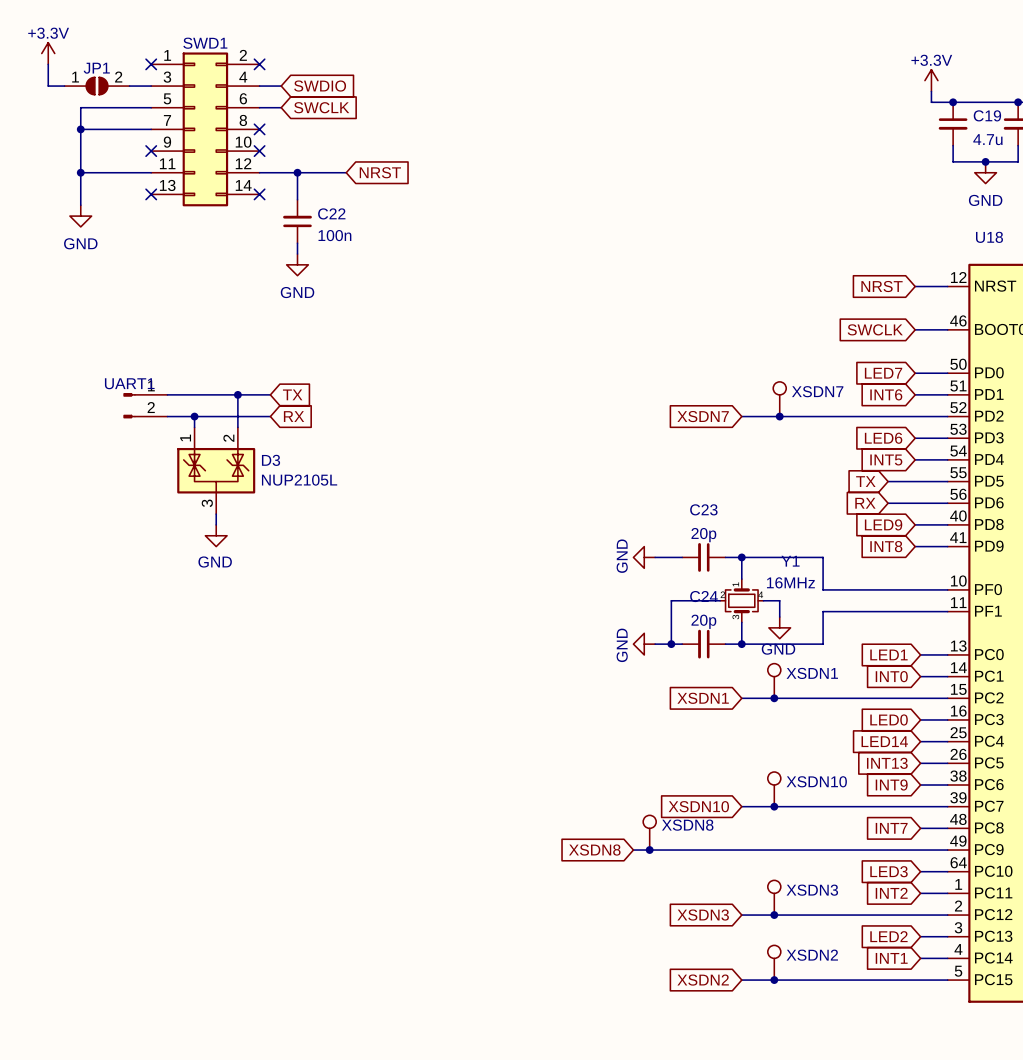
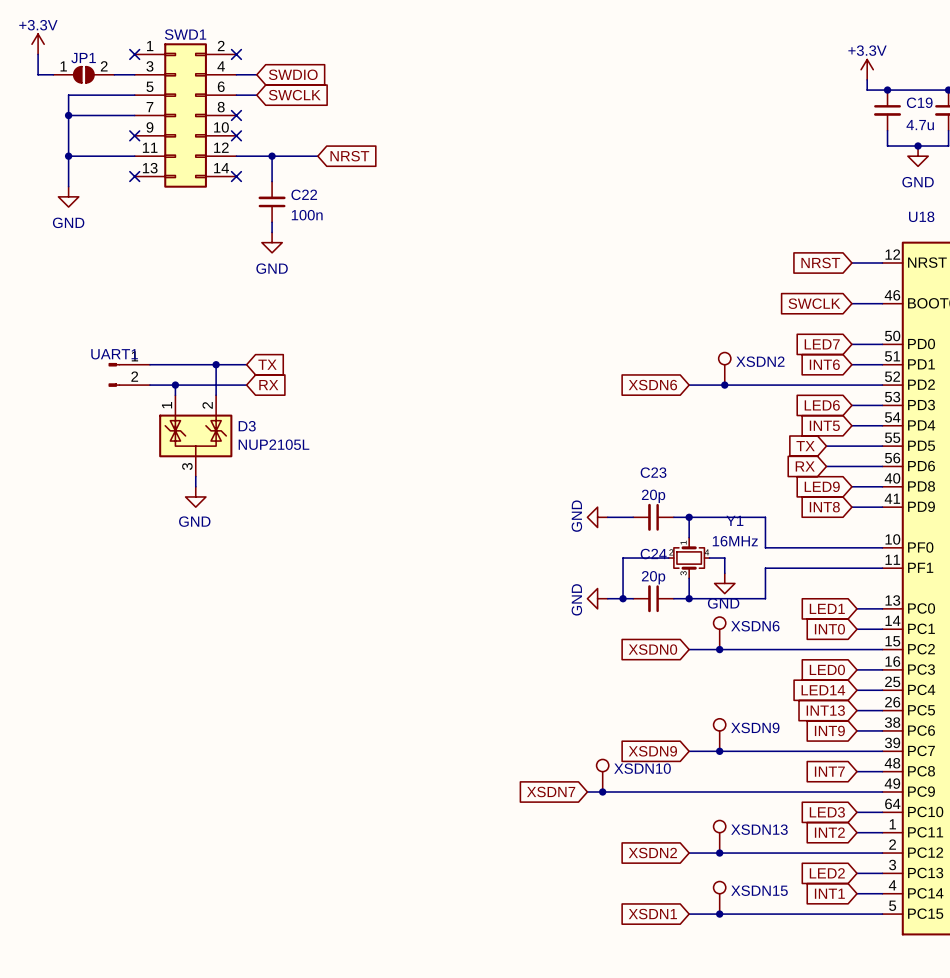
XSDN7 name: XSDN7 (817, 391) -> XSDN2 (760, 361)
global label: XSDN7 (703, 416) -> XSDN6 (652, 385)
XSDN1 name: XSDN1 (812, 673) -> XSDN6 (755, 626)
global label: XSDN1 (703, 698) -> XSDN0 (652, 649)
XSDN10 name: XSDN10 (816, 781) -> XSDN9 (755, 727)
global label: XSDN10 (698, 806) -> XSDN9 (652, 751)
XSDN8 name: XSDN8 (687, 825) -> XSDN10 (642, 768)
global label: XSDN8 (594, 850) -> XSDN7 (551, 791)
XSDN3 name: XSDN3 (812, 890) -> XSDN13 (759, 829)
global label: XSDN3 (703, 915) -> XSDN2 (652, 853)
XSDN2 name: XSDN2 (812, 955) -> XSDN15 (759, 890)
global label: XSDN2 (703, 980) -> XSDN1 (652, 914)

